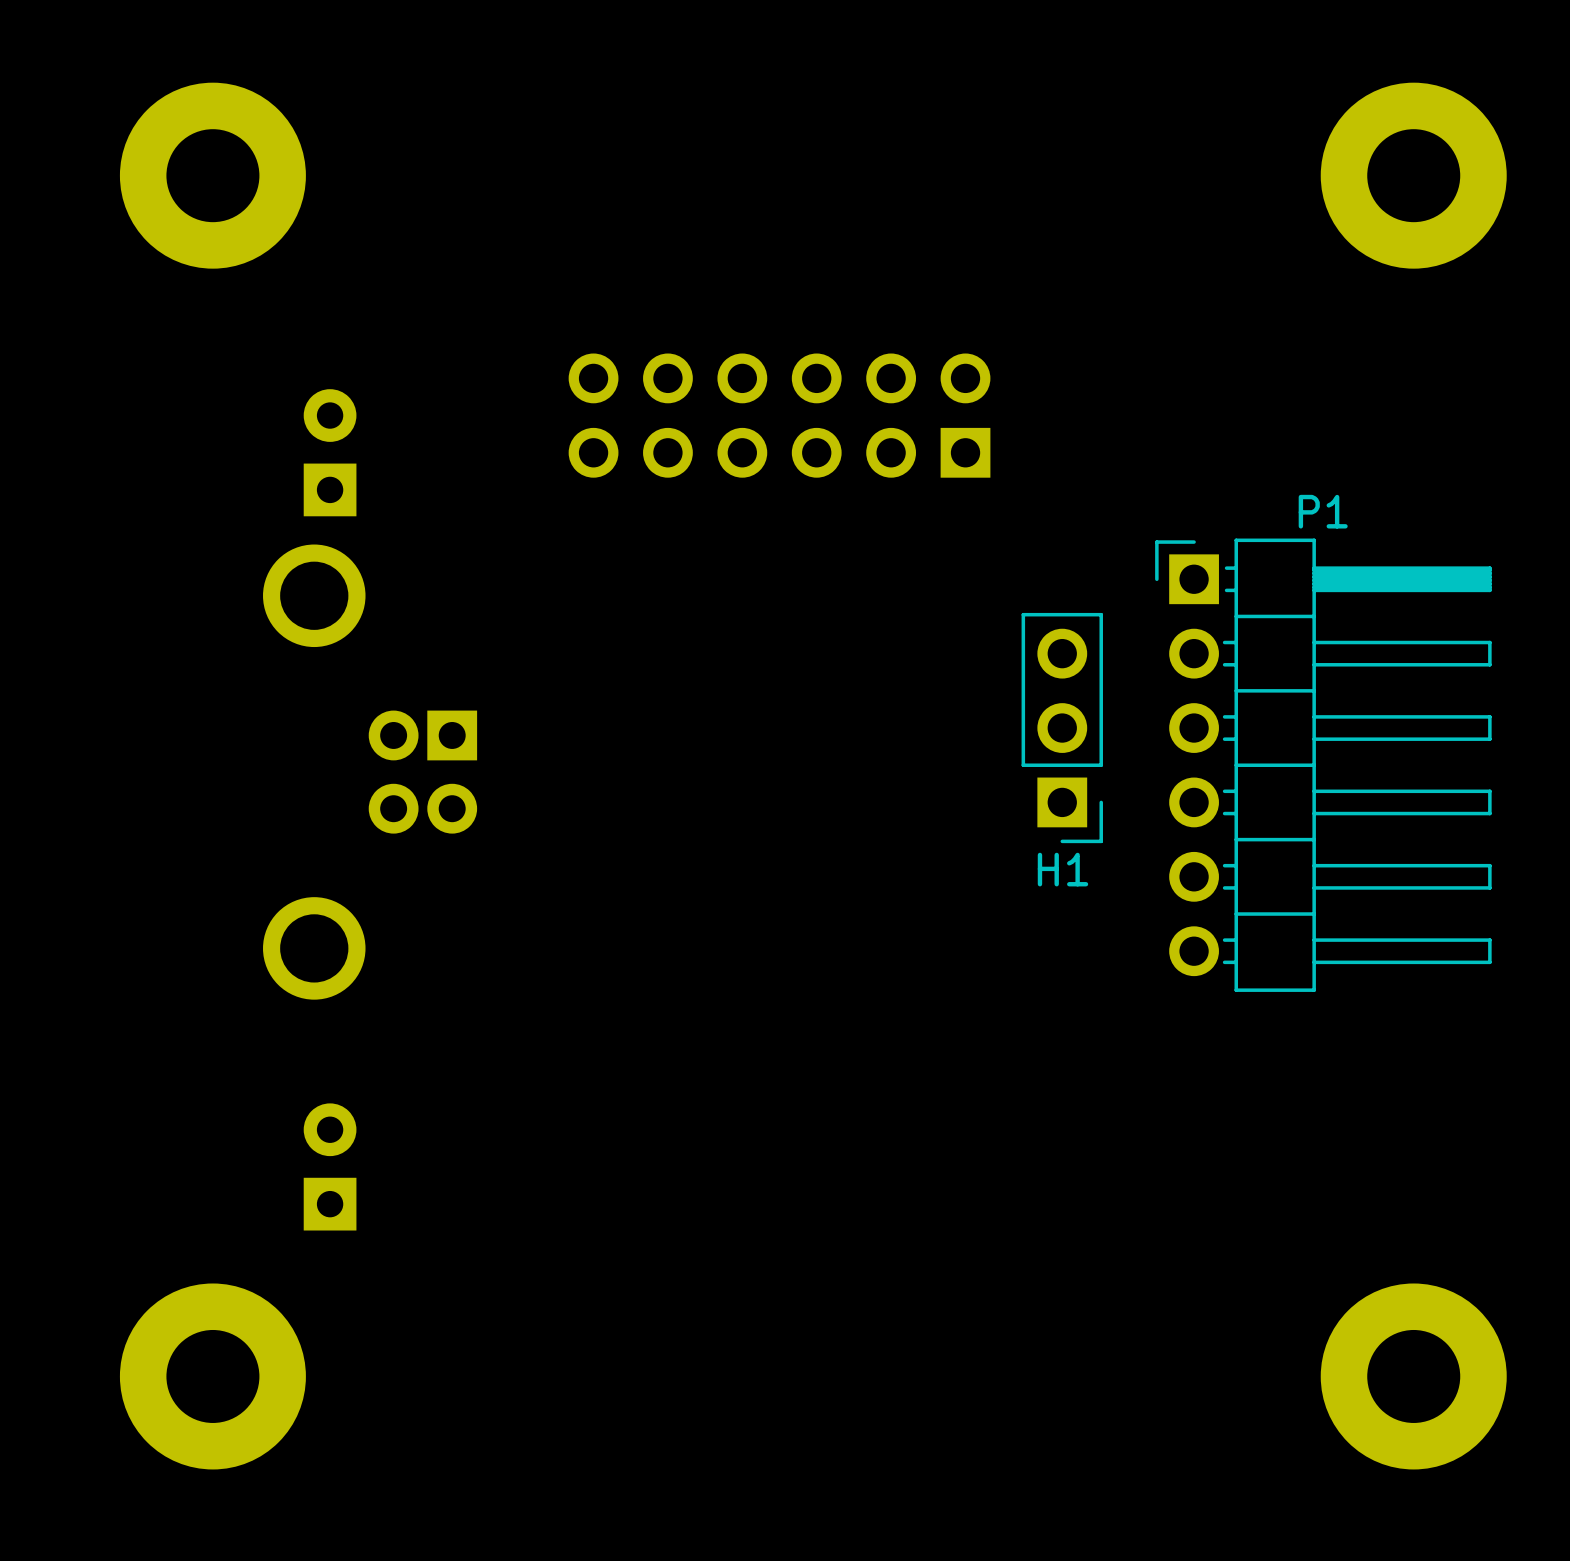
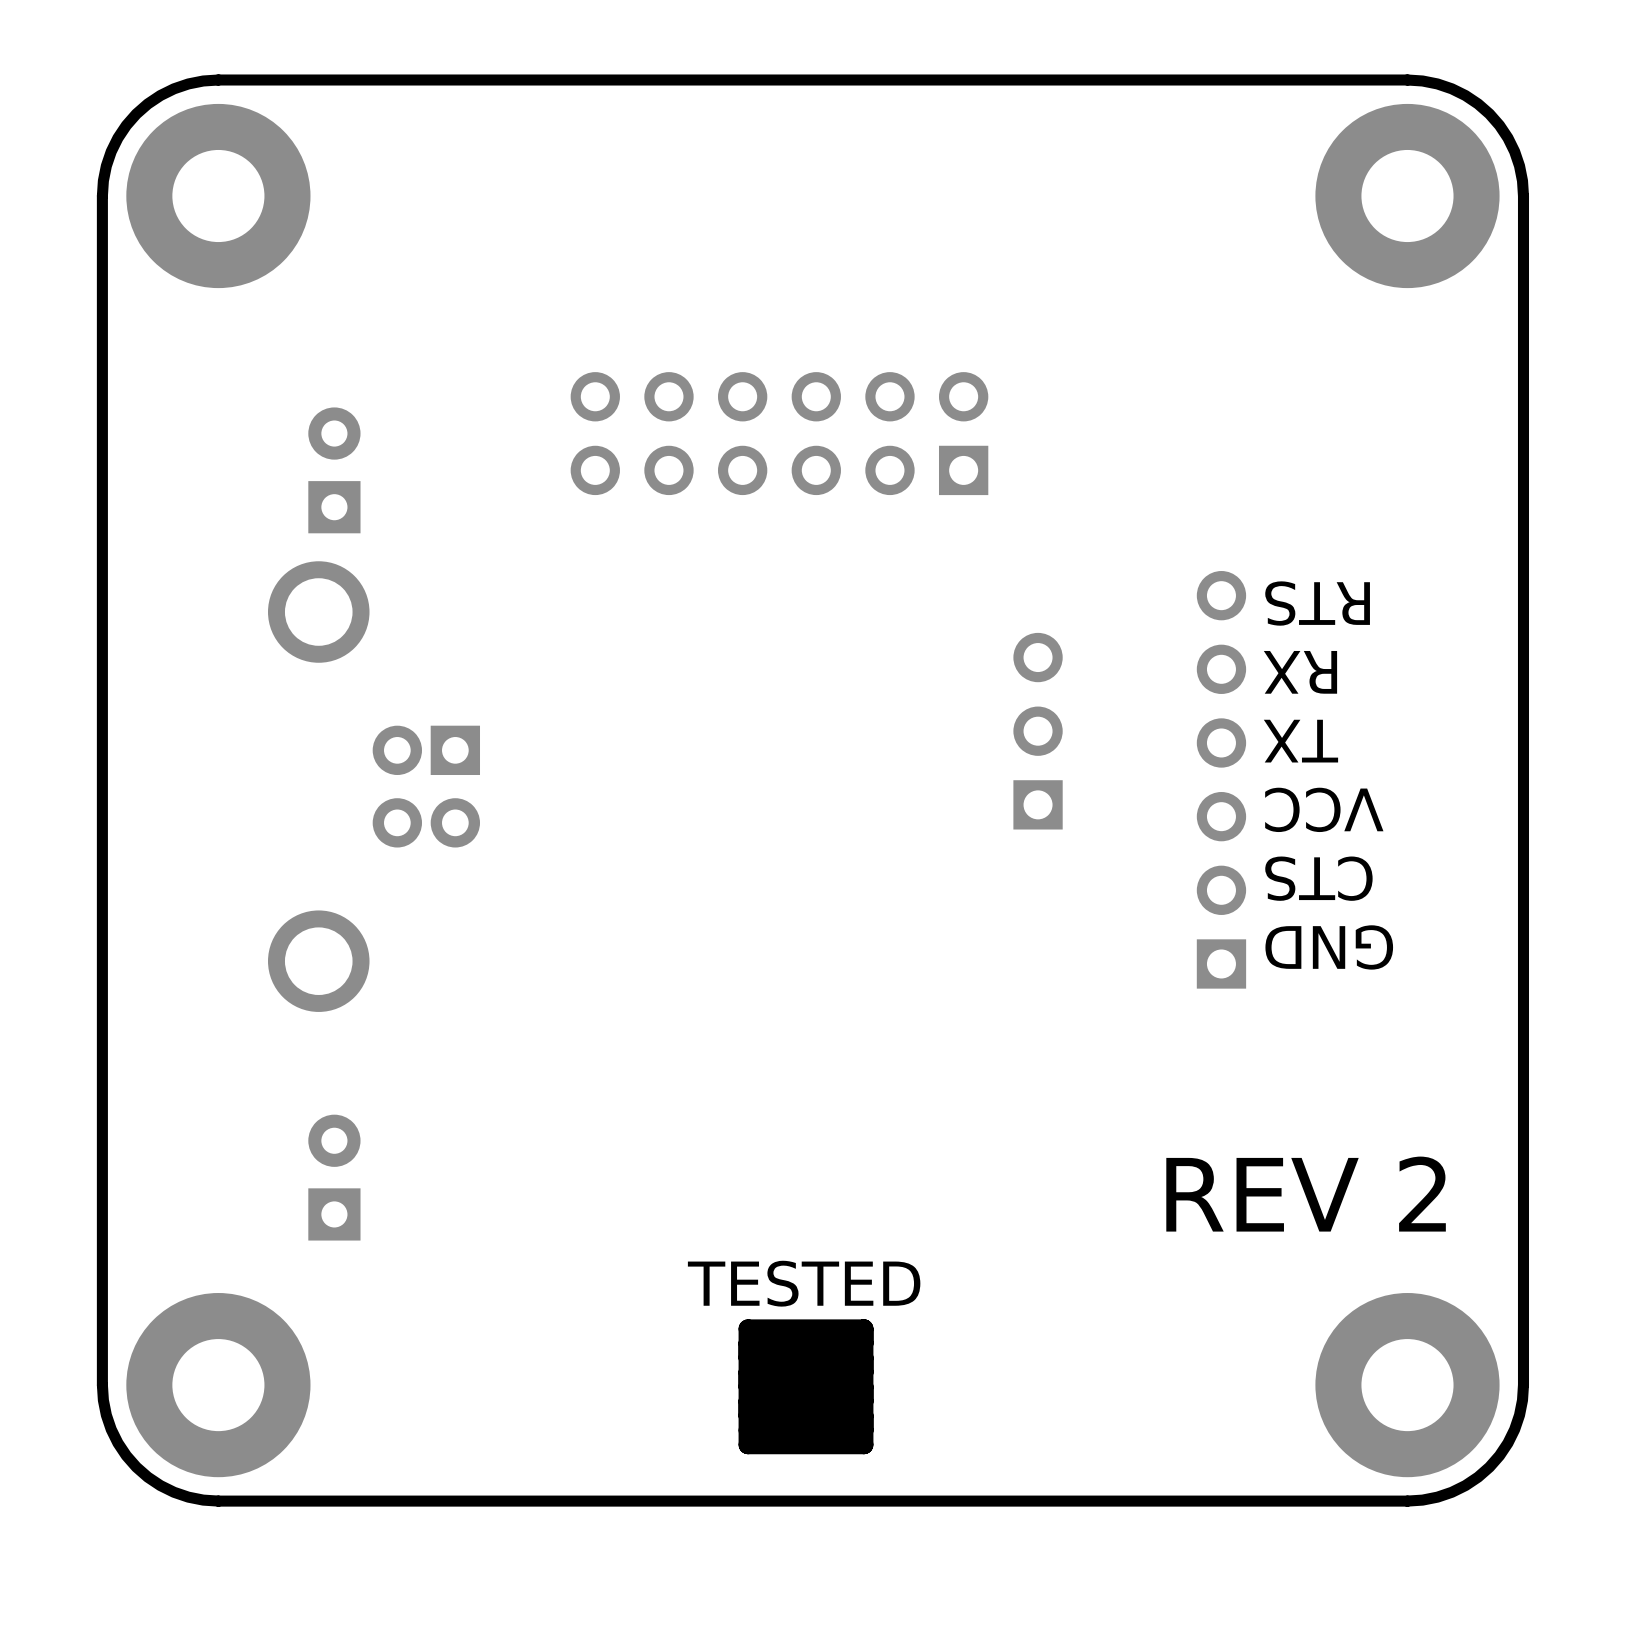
board edge: none -> (1407, 80) (218, 80) (203, 80) (174, 88) (147, 103) (136, 113) (117, 138) (111, 151) (103, 180) (102, 196) (102, 1385) (103, 1400) (111, 1429) (117, 1443) (136, 1467) (160, 1485) (174, 1492) (203, 1500) (218, 1501) (1407, 1501) (1422, 1500) (1451, 1492) (1465, 1485) (1489, 1467) (1499, 1455) (1514, 1429) (1522, 1400) (1523, 1385) (1523, 196) (1519, 165) (1514, 151) (1499, 125) (1489, 113) (1465, 95) (1451, 88) (1437, 83) (1407, 80)
text: none -> RTS (1317, 603)
text: none -> RX (1300, 672)
text: none -> TX (1300, 741)
H1 side: bottom (1062, 728) -> top (1038, 731)
P1 side: bottom (1323, 765) -> top (1221, 779)
text: none -> VCC (1324, 809)
text: none -> CTS (1318, 878)
text: none -> GND (1329, 947)
text: none -> REV 2 (1306, 1194)
TESTED: none -> (806, 1386)

